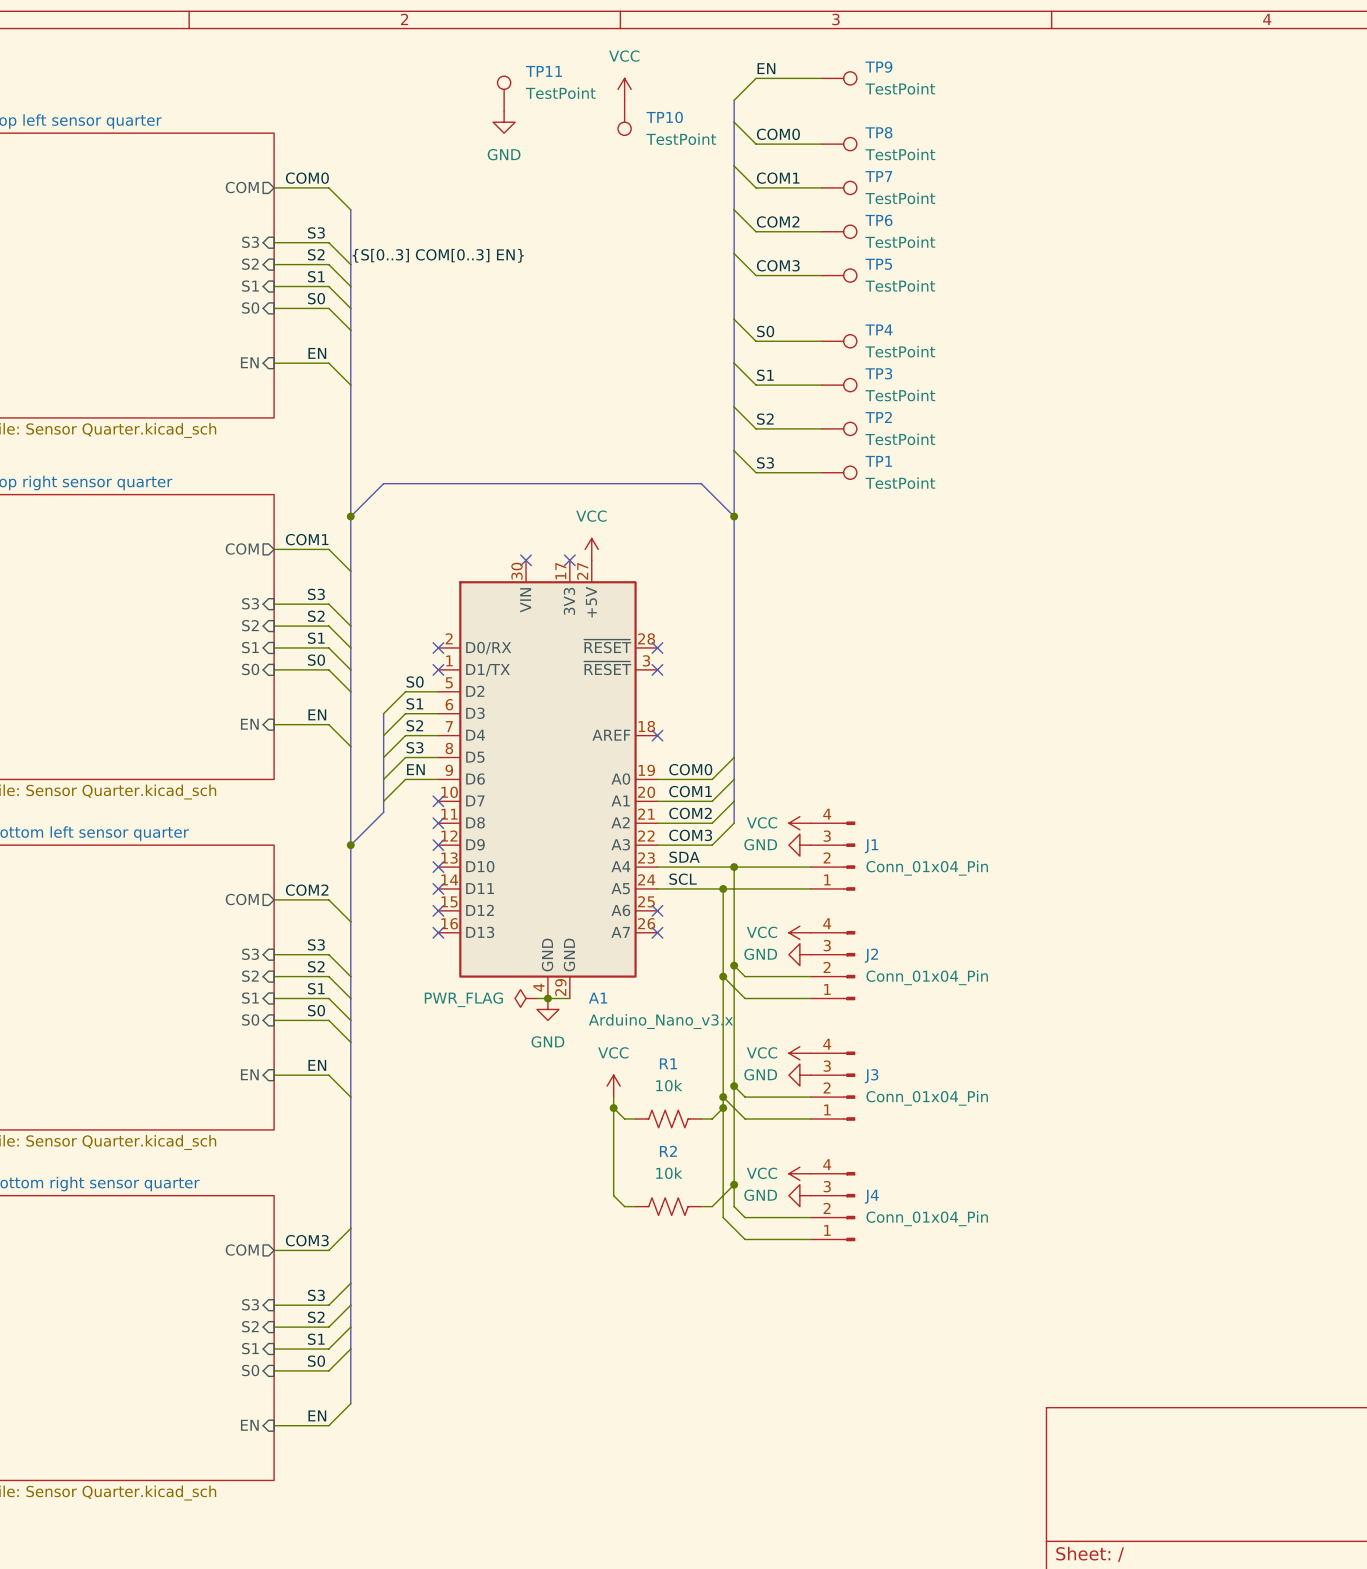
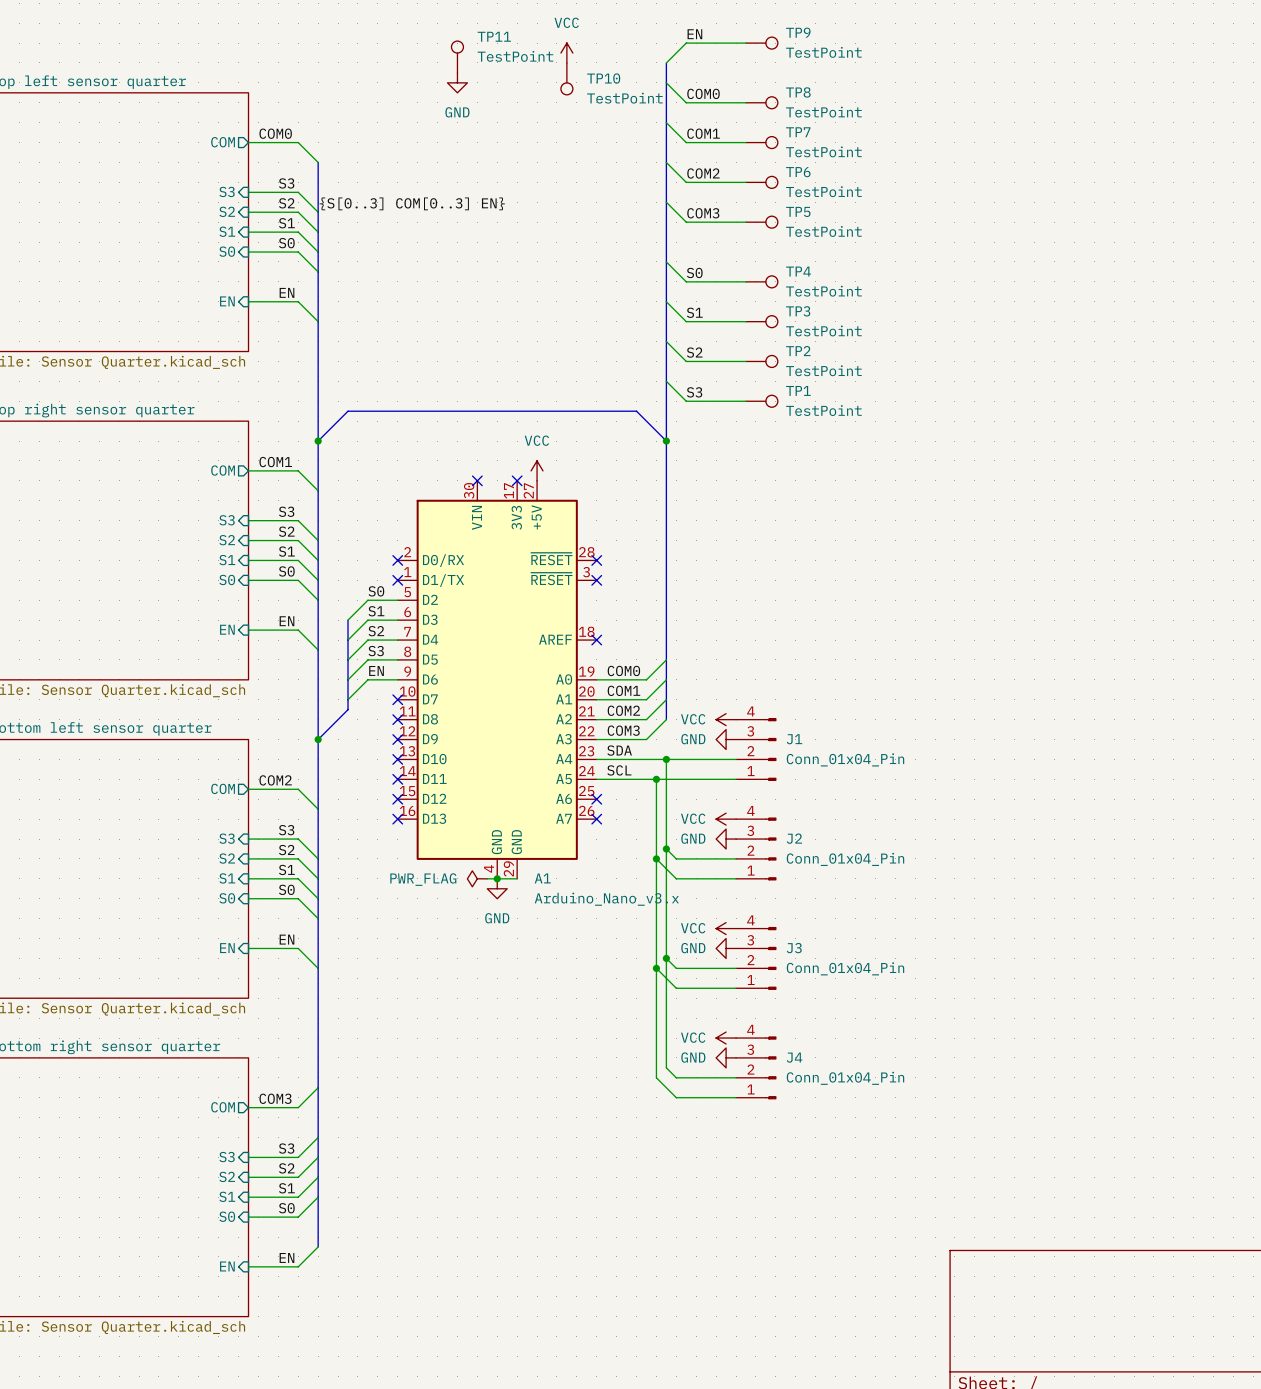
power symbol: VCC (613, 1086) -> none
wire: (613, 1097) (613, 1195) (624, 1206) (635, 1206) -> none
wire: (613, 1108) (624, 1118) (635, 1118) -> none
junction: (613, 1108) -> none
wire: (723, 1108) (712, 1118) (701, 1118) -> none
junction: (723, 1108) -> none
R1: 10k (668, 1118) -> none
wire: (734, 1184) (712, 1206) (701, 1206) -> none
junction: (734, 1184) -> none
R2: 10k (668, 1206) -> none

